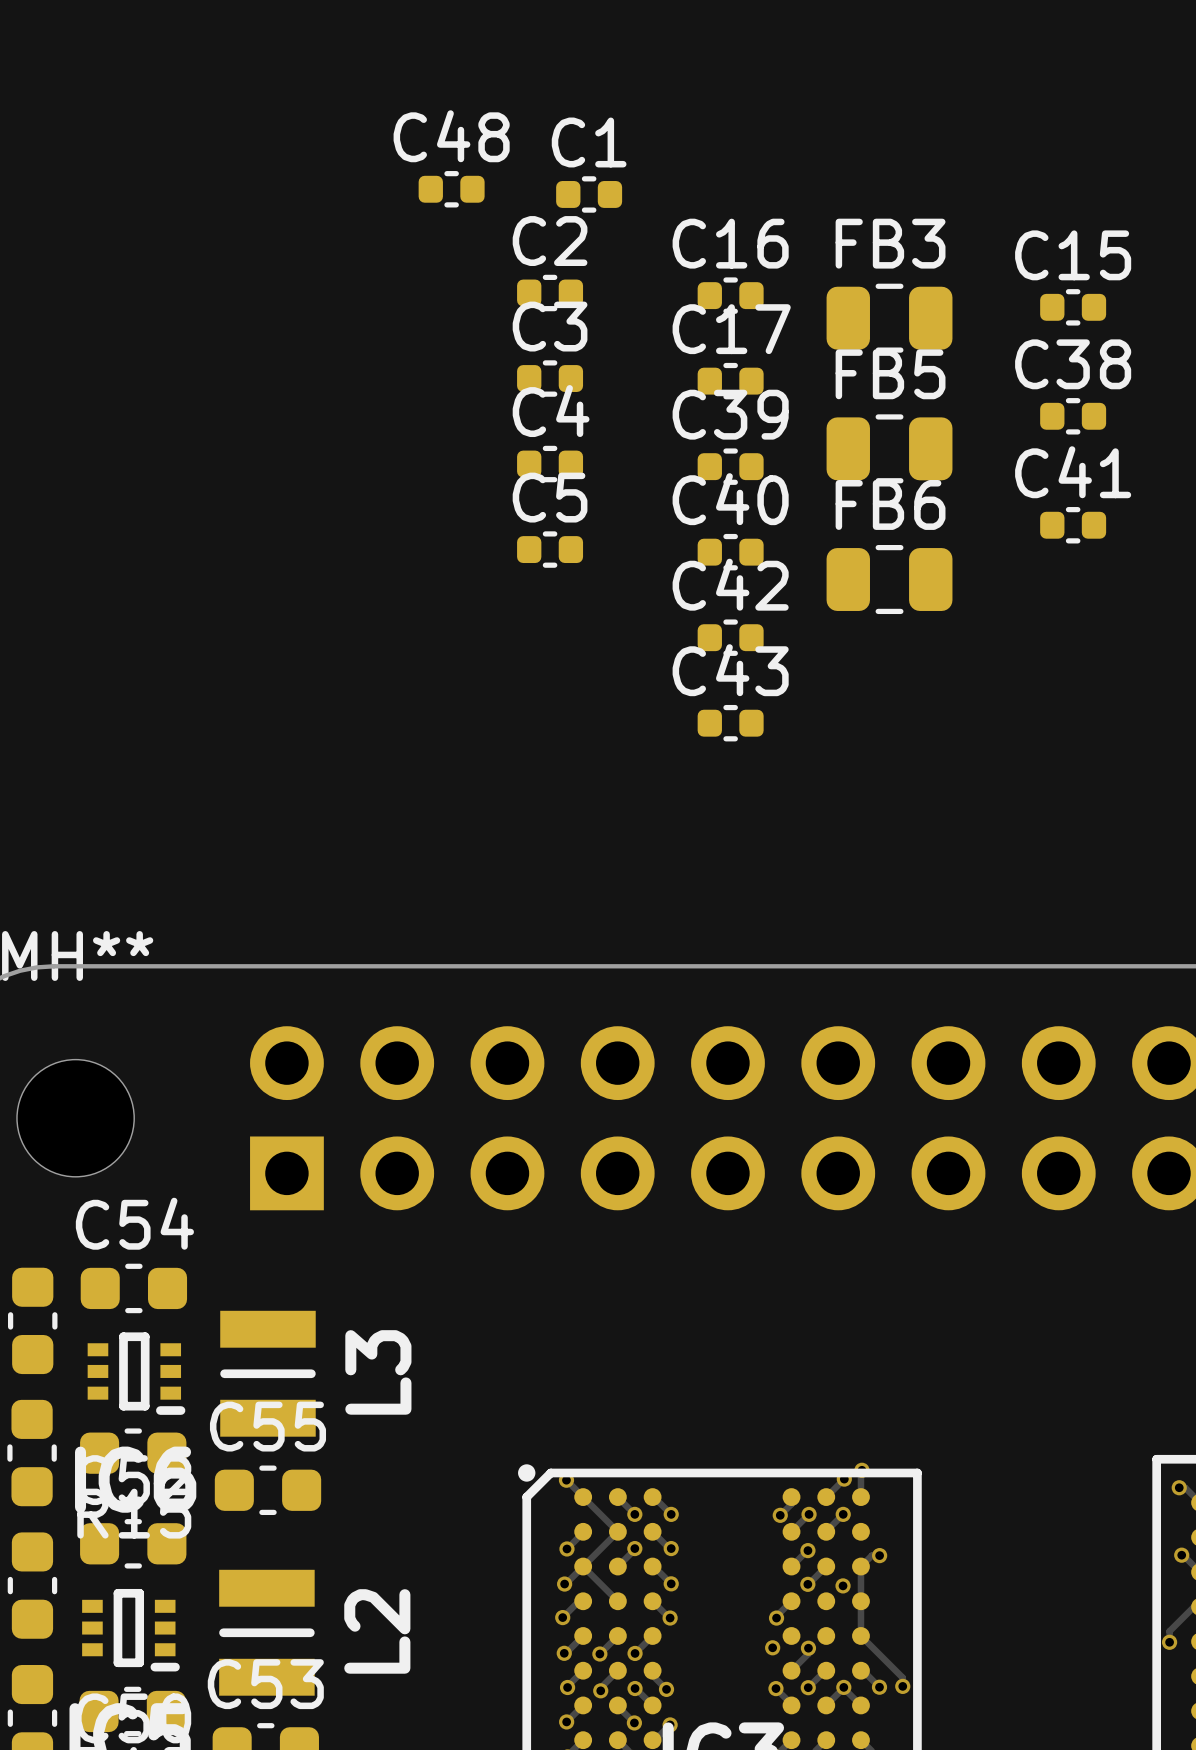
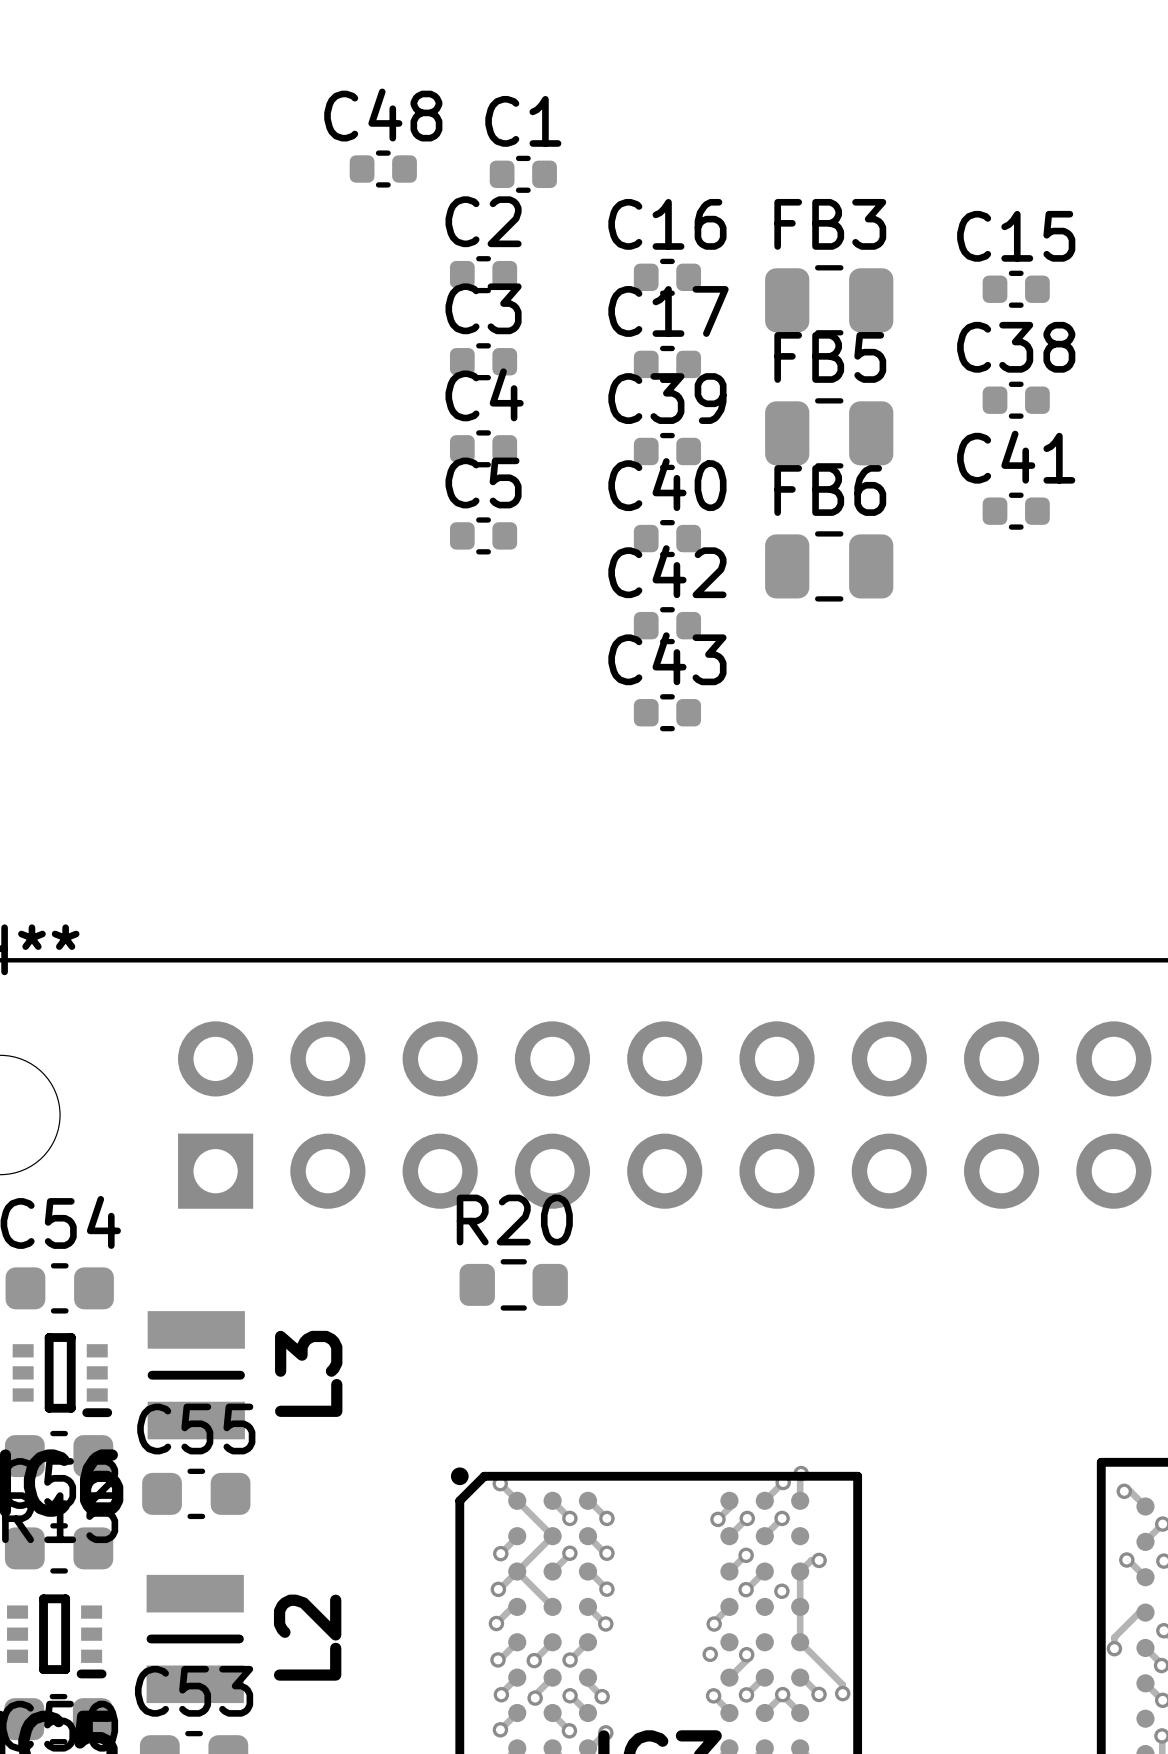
R20: none -> (513, 1284)

